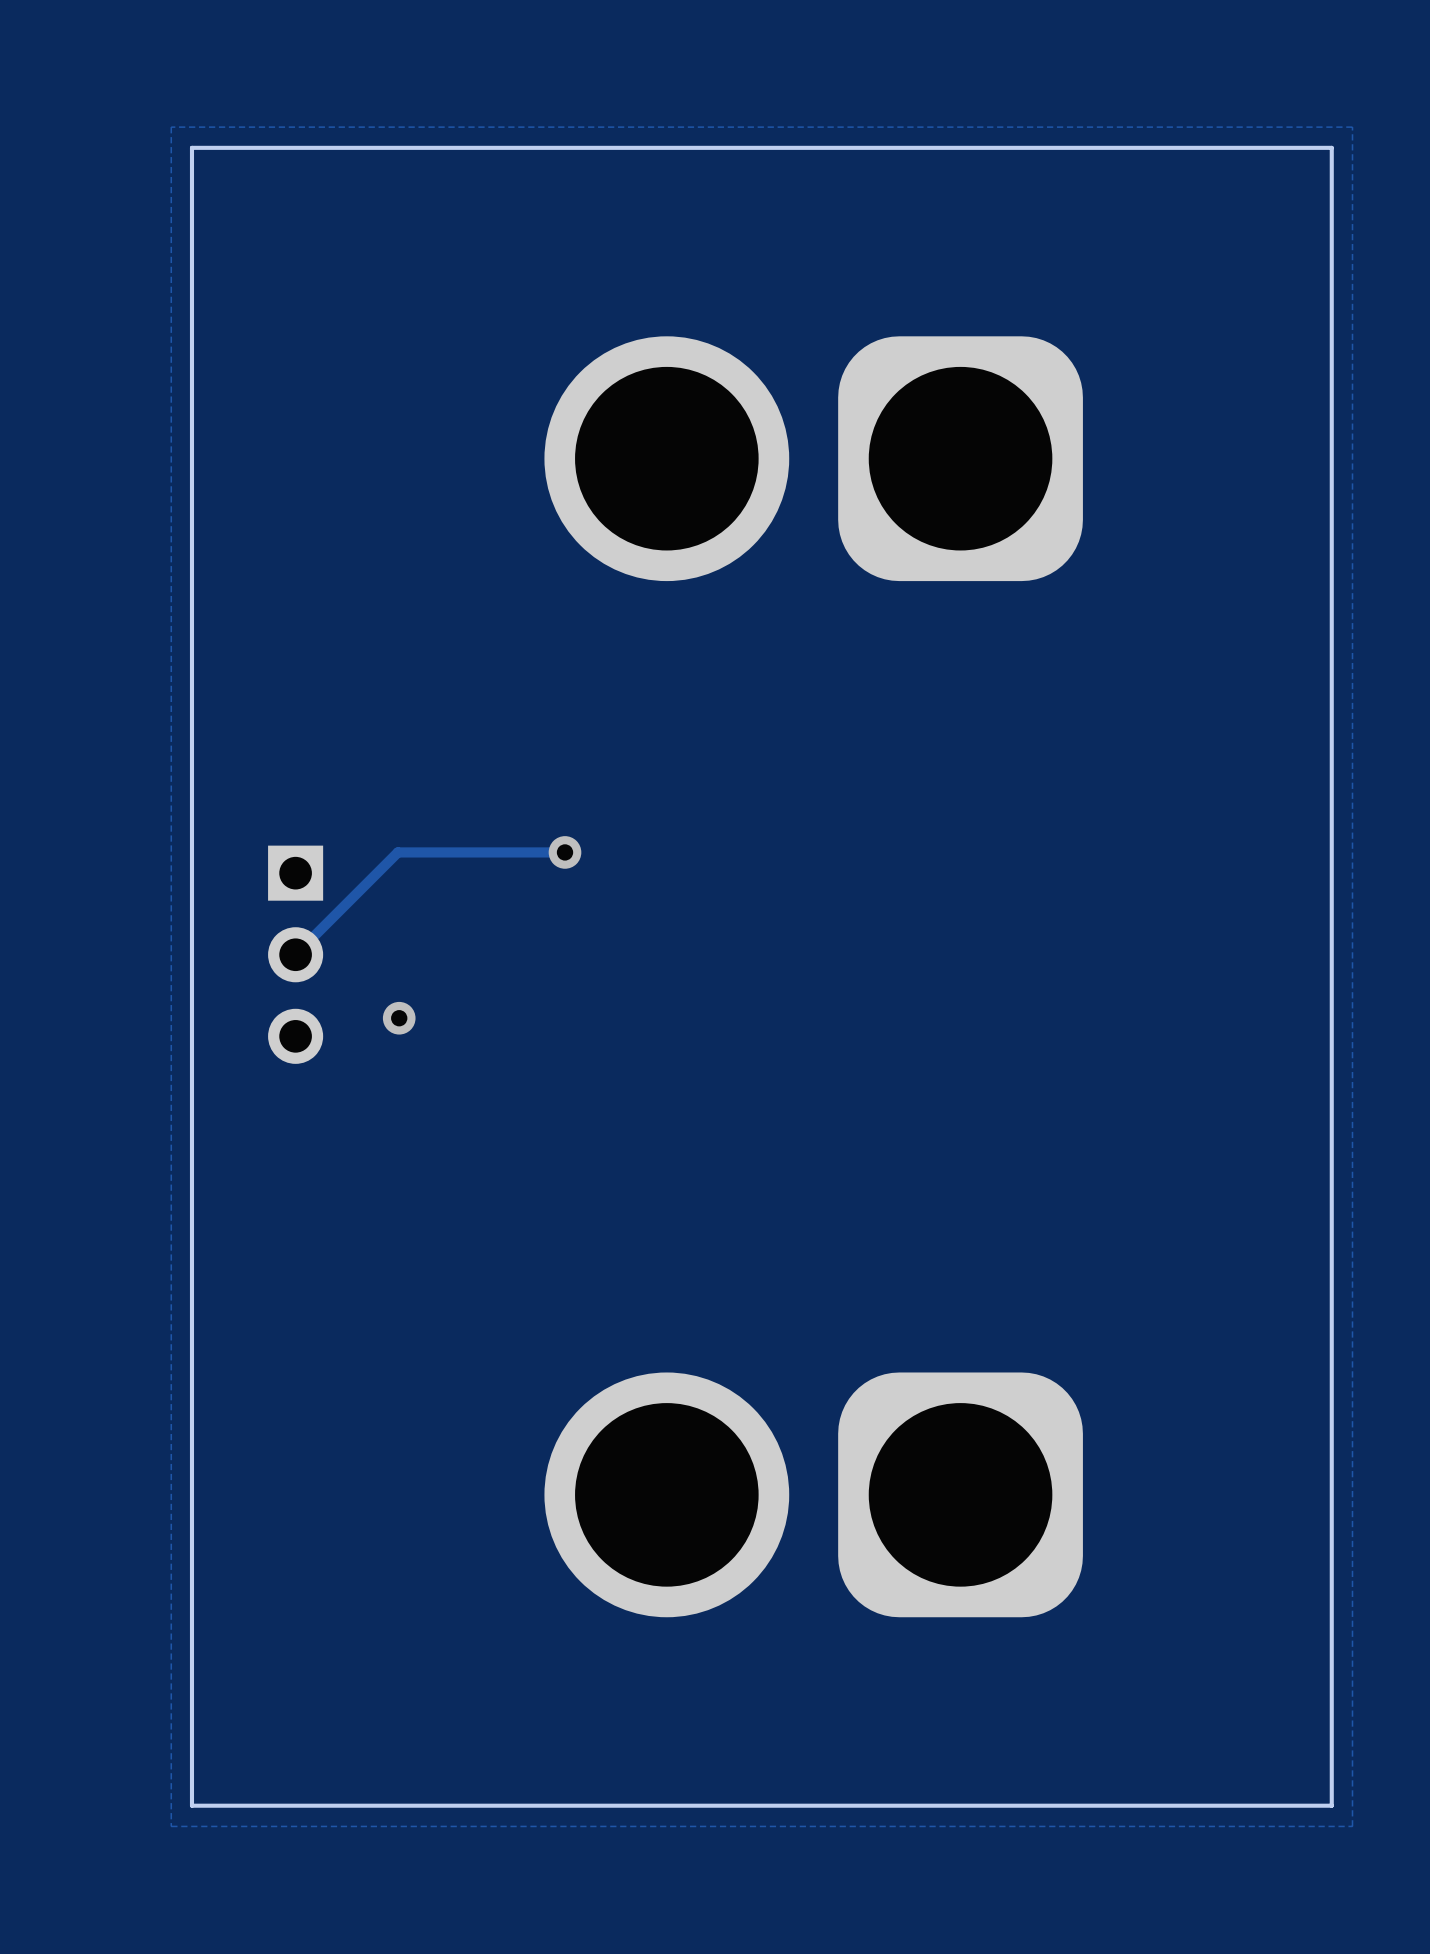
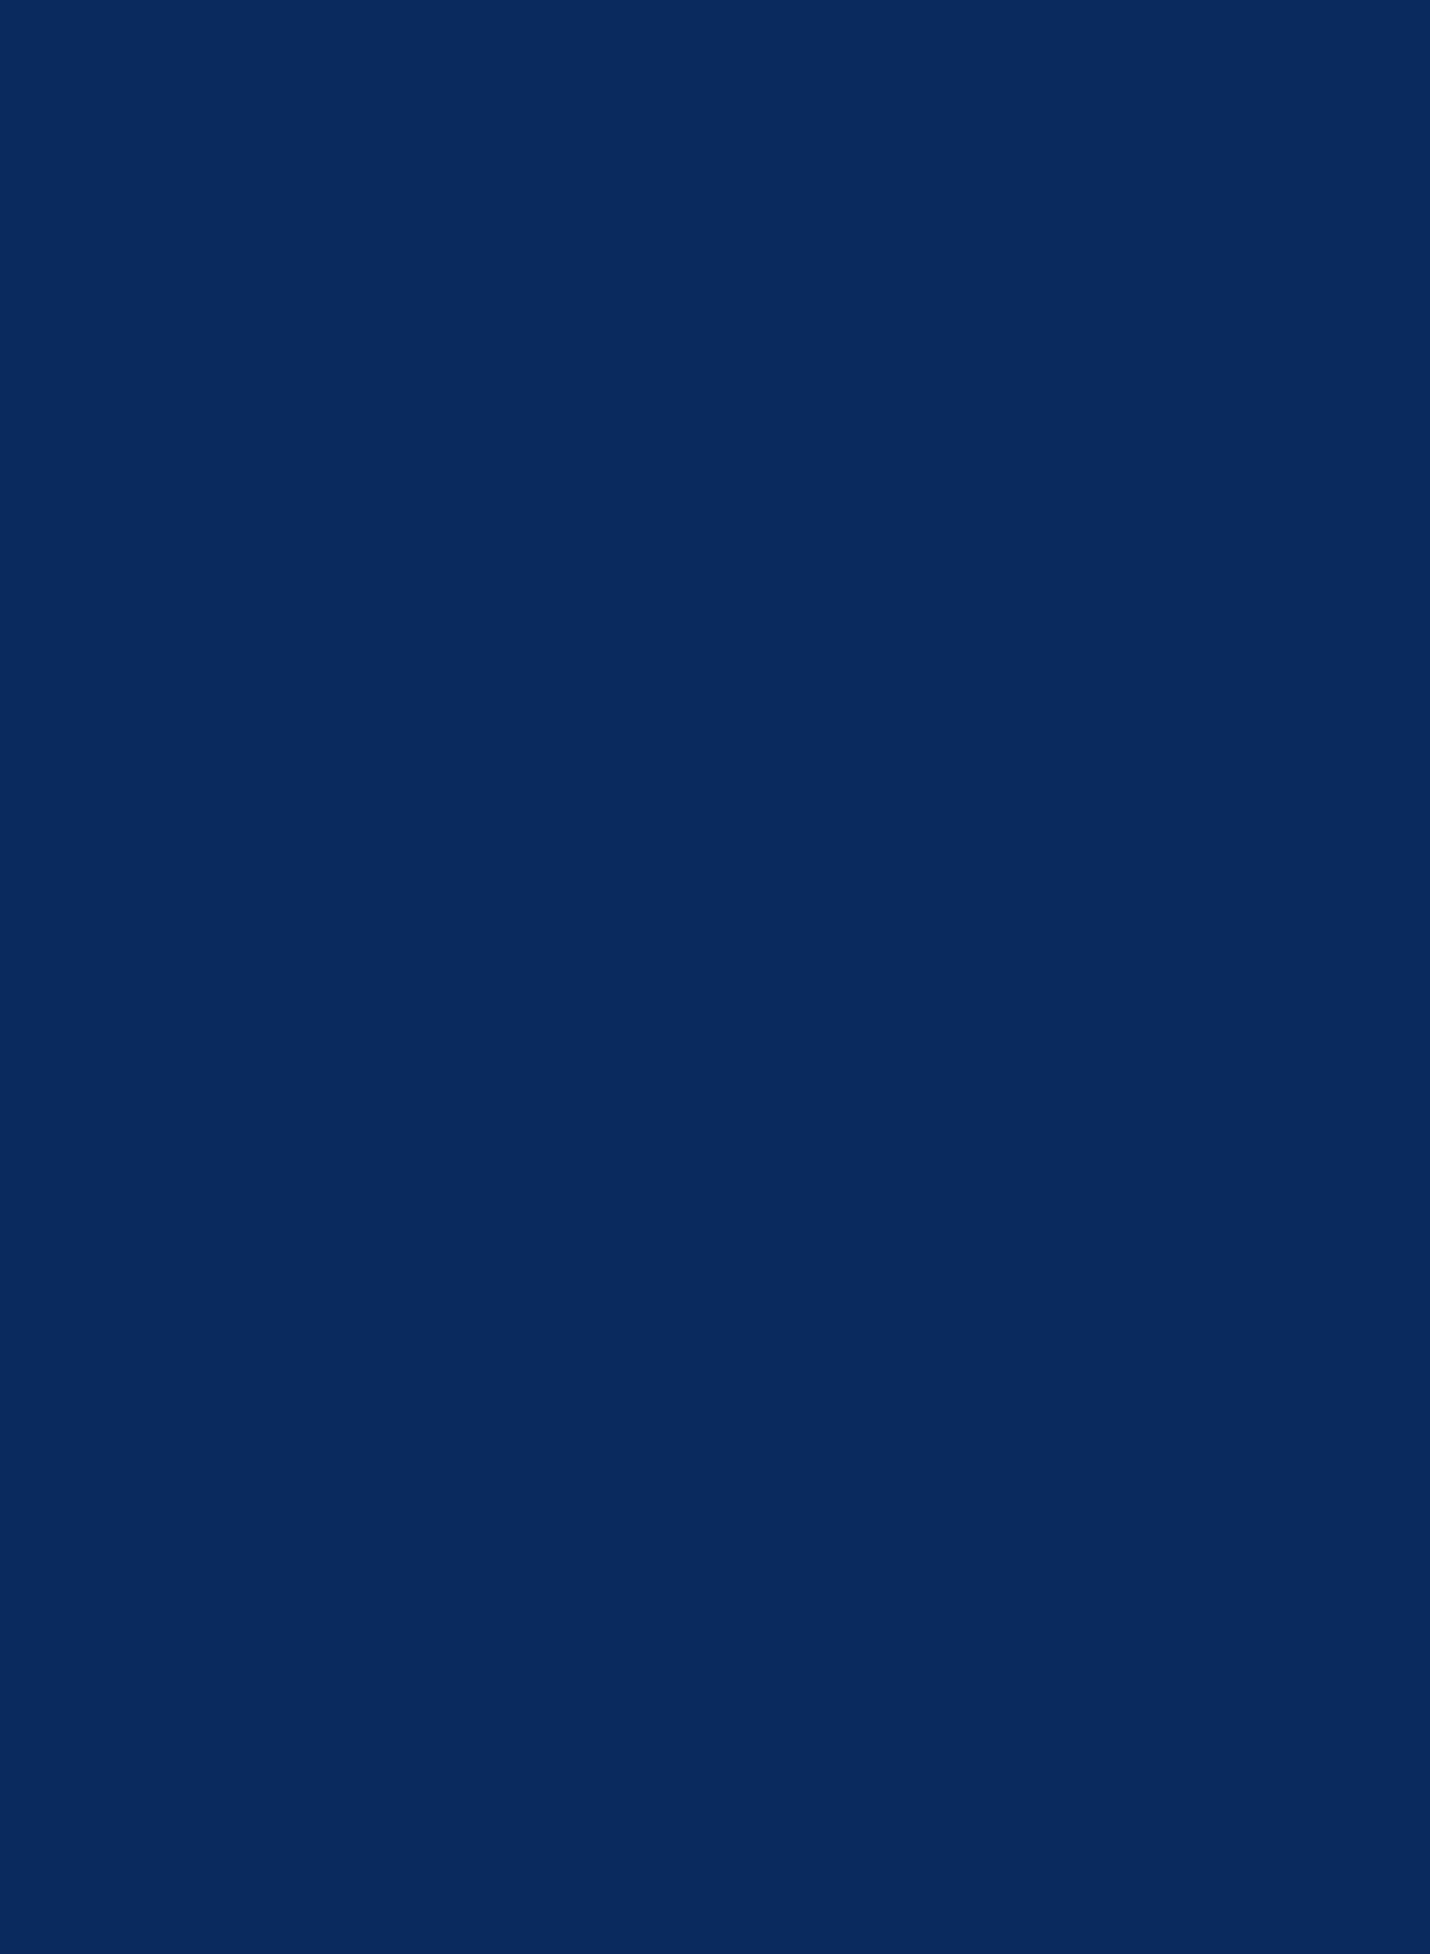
zone outline: (1352, 127) (1352, 1826) (171, 1826) (171, 127) (1352, 127) -> none
board edge: (1331, 147) (1331, 1805) (191, 1805) (191, 147) (1331, 147) -> none
part: (813, 458) -> none
track: (565, 852) (397, 852) (295, 954) -> none
via: (565, 852) -> none
part: (295, 954) -> none
via: (399, 1018) -> none
part: (813, 1494) -> none

